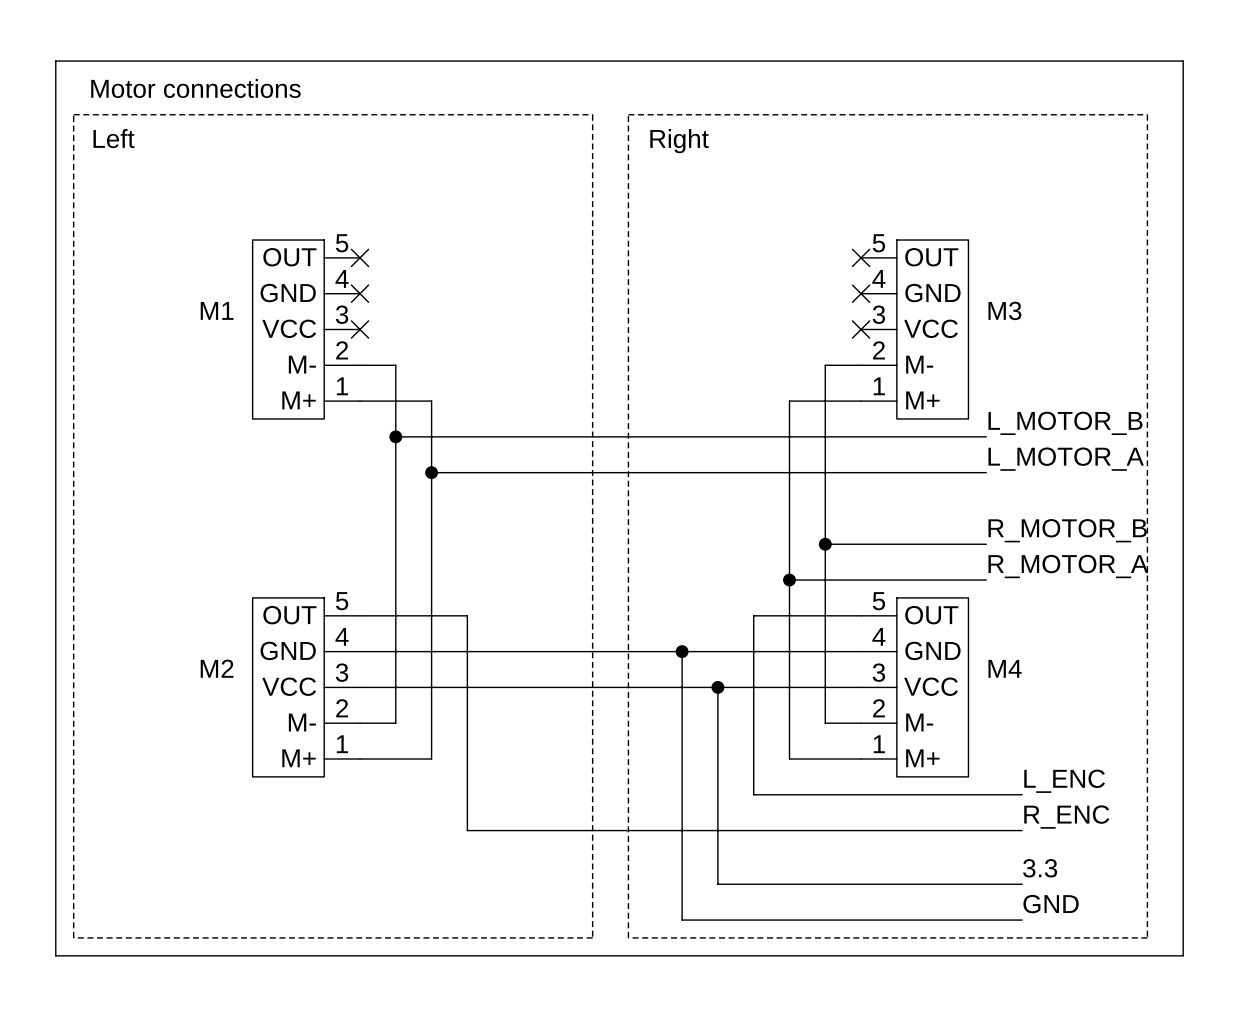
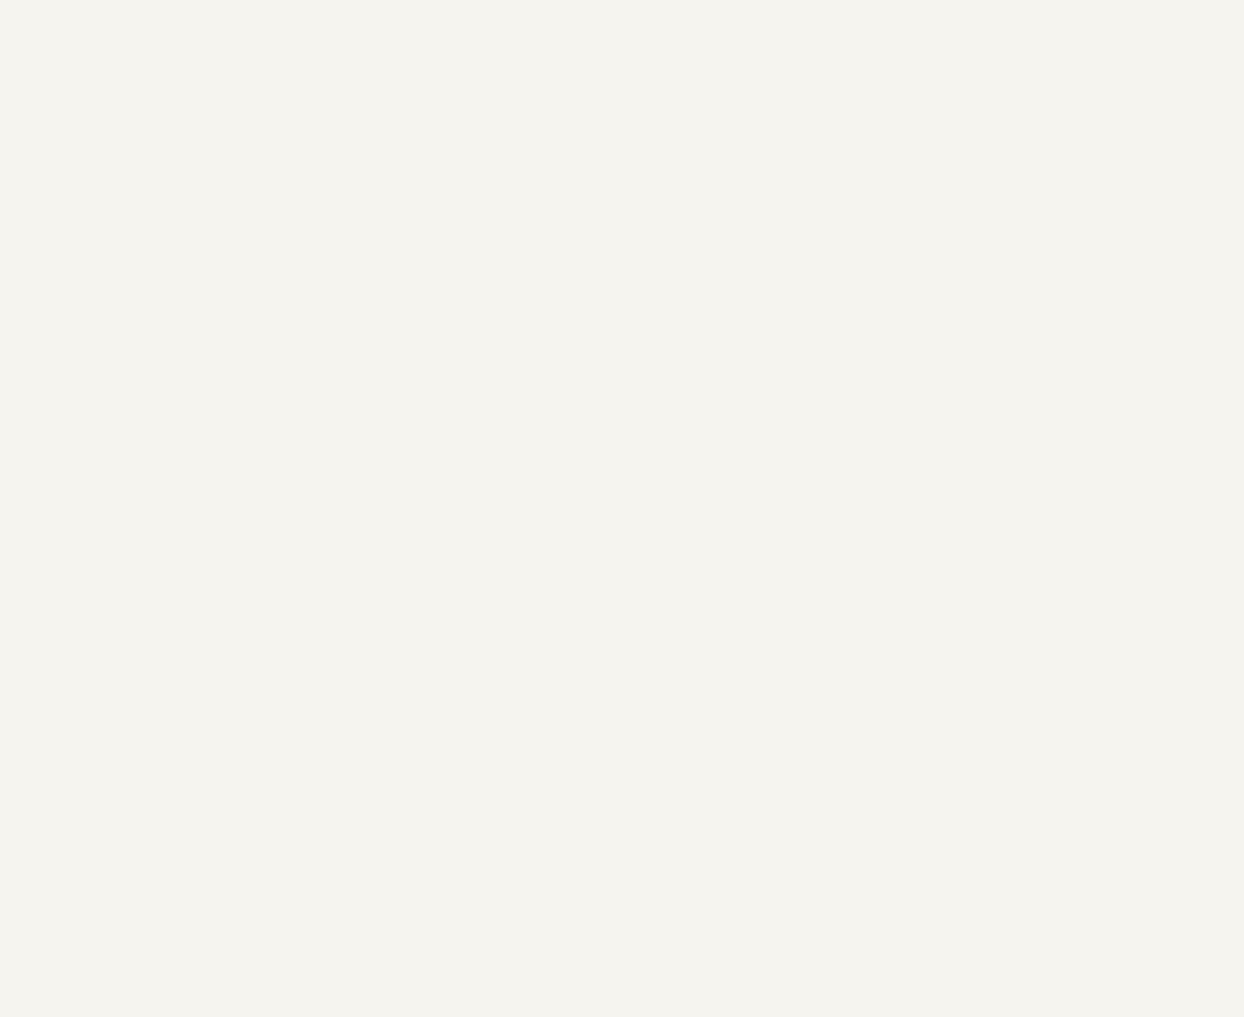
line: (55, 61) (1183, 61) (1183, 955) (55, 955) (55, 61) -> none
text: Motor connections (195, 88) -> none
line: (73, 114) (592, 114) (592, 937) (73, 937) (73, 114) -> none
line: (628, 114) (1147, 114) (1147, 937) (628, 937) (628, 114) -> none
text: Left (114, 138) -> none
text: Right (679, 141) -> none
no-connect mark: (360, 257) -> none
no-connect mark: (861, 257) -> none
no-connect mark: (360, 293) -> none
no-connect mark: (861, 293) -> none
M1: (306, 329) -> none
no-connect mark: (360, 329) -> none
no-connect mark: (861, 329) -> none
M3: (914, 329) -> none
wire: (360, 365) (395, 365) (395, 723) (360, 723) -> none
wire: (861, 365) (825, 365) (825, 723) (861, 723) -> none
wire: (360, 401) (431, 401) (431, 758) (360, 758) -> none
wire: (861, 401) (789, 401) (789, 758) (861, 758) -> none
label: L_MOTOR_B (1065, 423) -> none
wire: (395, 436) (986, 436) -> none
junction: (395, 436) -> none
label: L_MOTOR_A (1066, 459) -> none
wire: (431, 472) (986, 472) -> none
junction: (431, 472) -> none
label: R_MOTOR_B (1067, 530) -> none
wire: (825, 544) (986, 544) -> none
junction: (825, 544) -> none
label: R_MOTOR_A (1068, 566) -> none
wire: (789, 580) (986, 580) -> none
junction: (789, 580) -> none
wire: (360, 615) (467, 615) (467, 830) (1022, 830) -> none
wire: (861, 615) (753, 615) (753, 794) (1022, 794) -> none
wire: (360, 651) (861, 651) -> none
wire: (682, 651) (682, 920) (1022, 920) -> none
junction: (682, 651) -> none
M2: (306, 687) -> none
wire: (360, 687) (861, 687) -> none
wire: (717, 687) (717, 884) (1022, 884) -> none
junction: (717, 687) -> none
M4: (914, 687) -> none
label: L_ENC (1064, 781) -> none
label: R_ENC (1066, 817) -> none
label: 3.3 (1040, 868) -> none
label: GND (1051, 904) -> none

